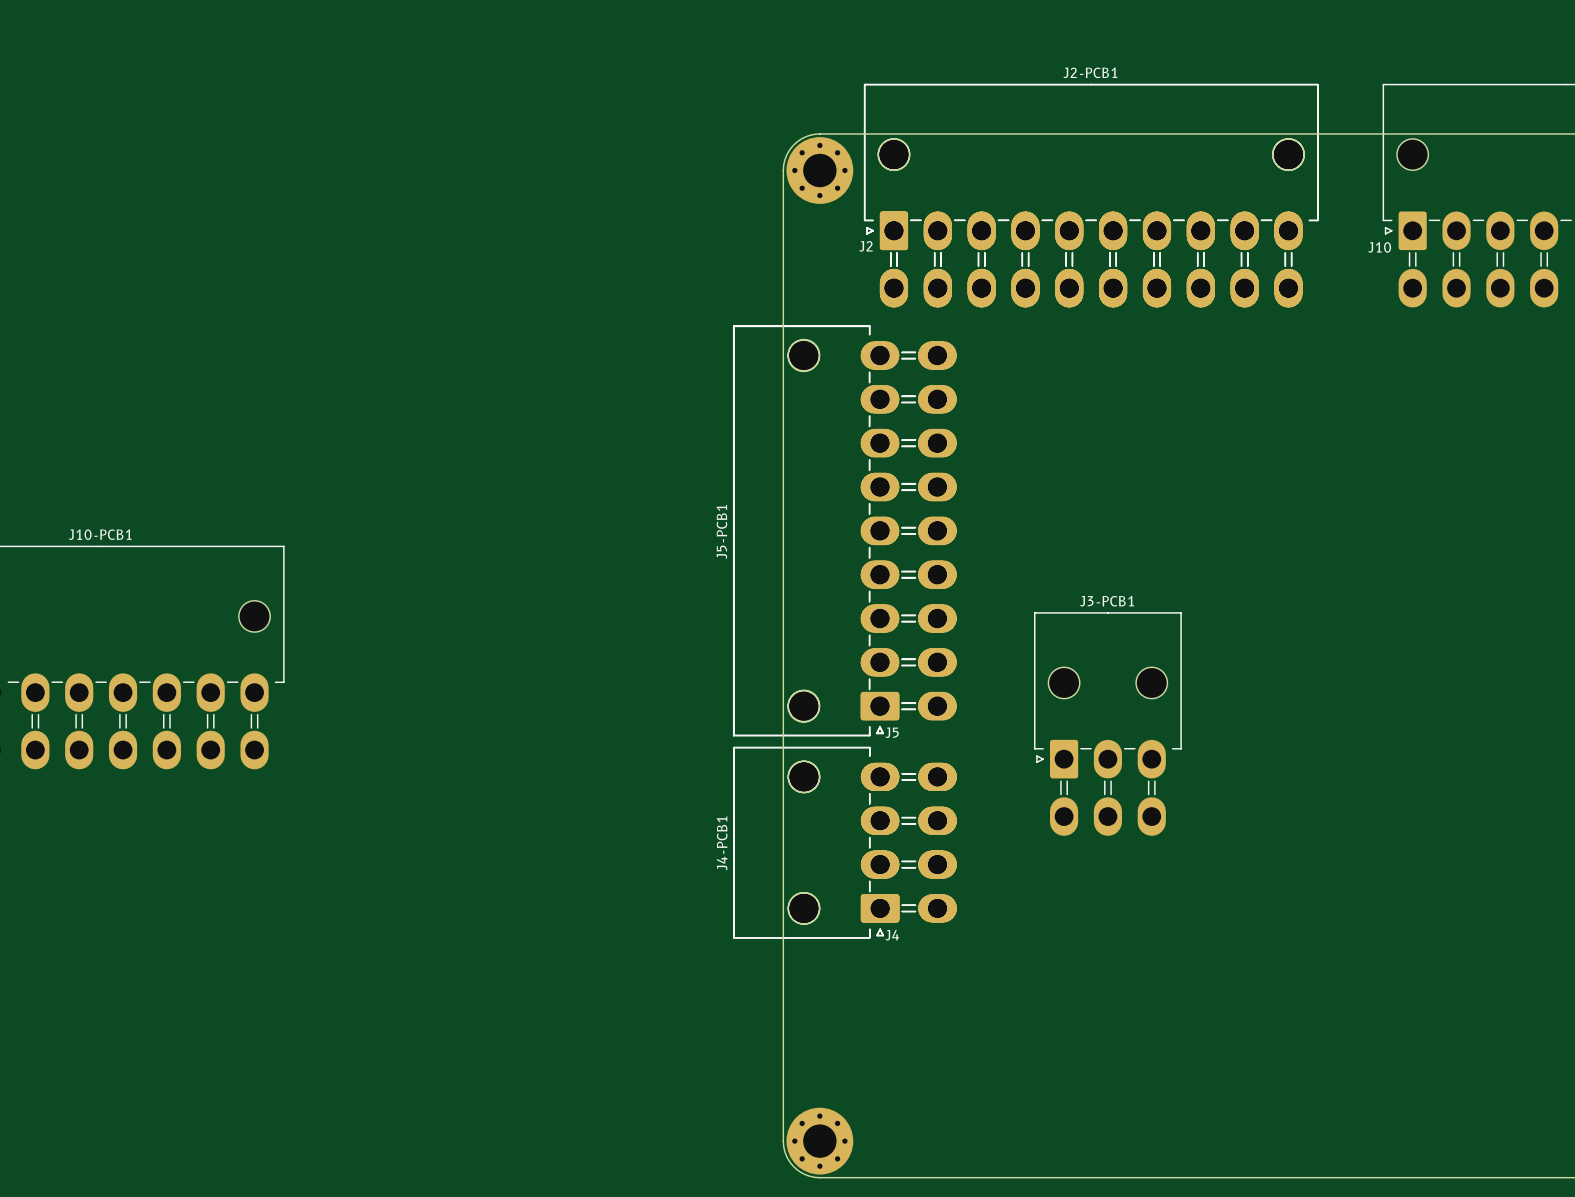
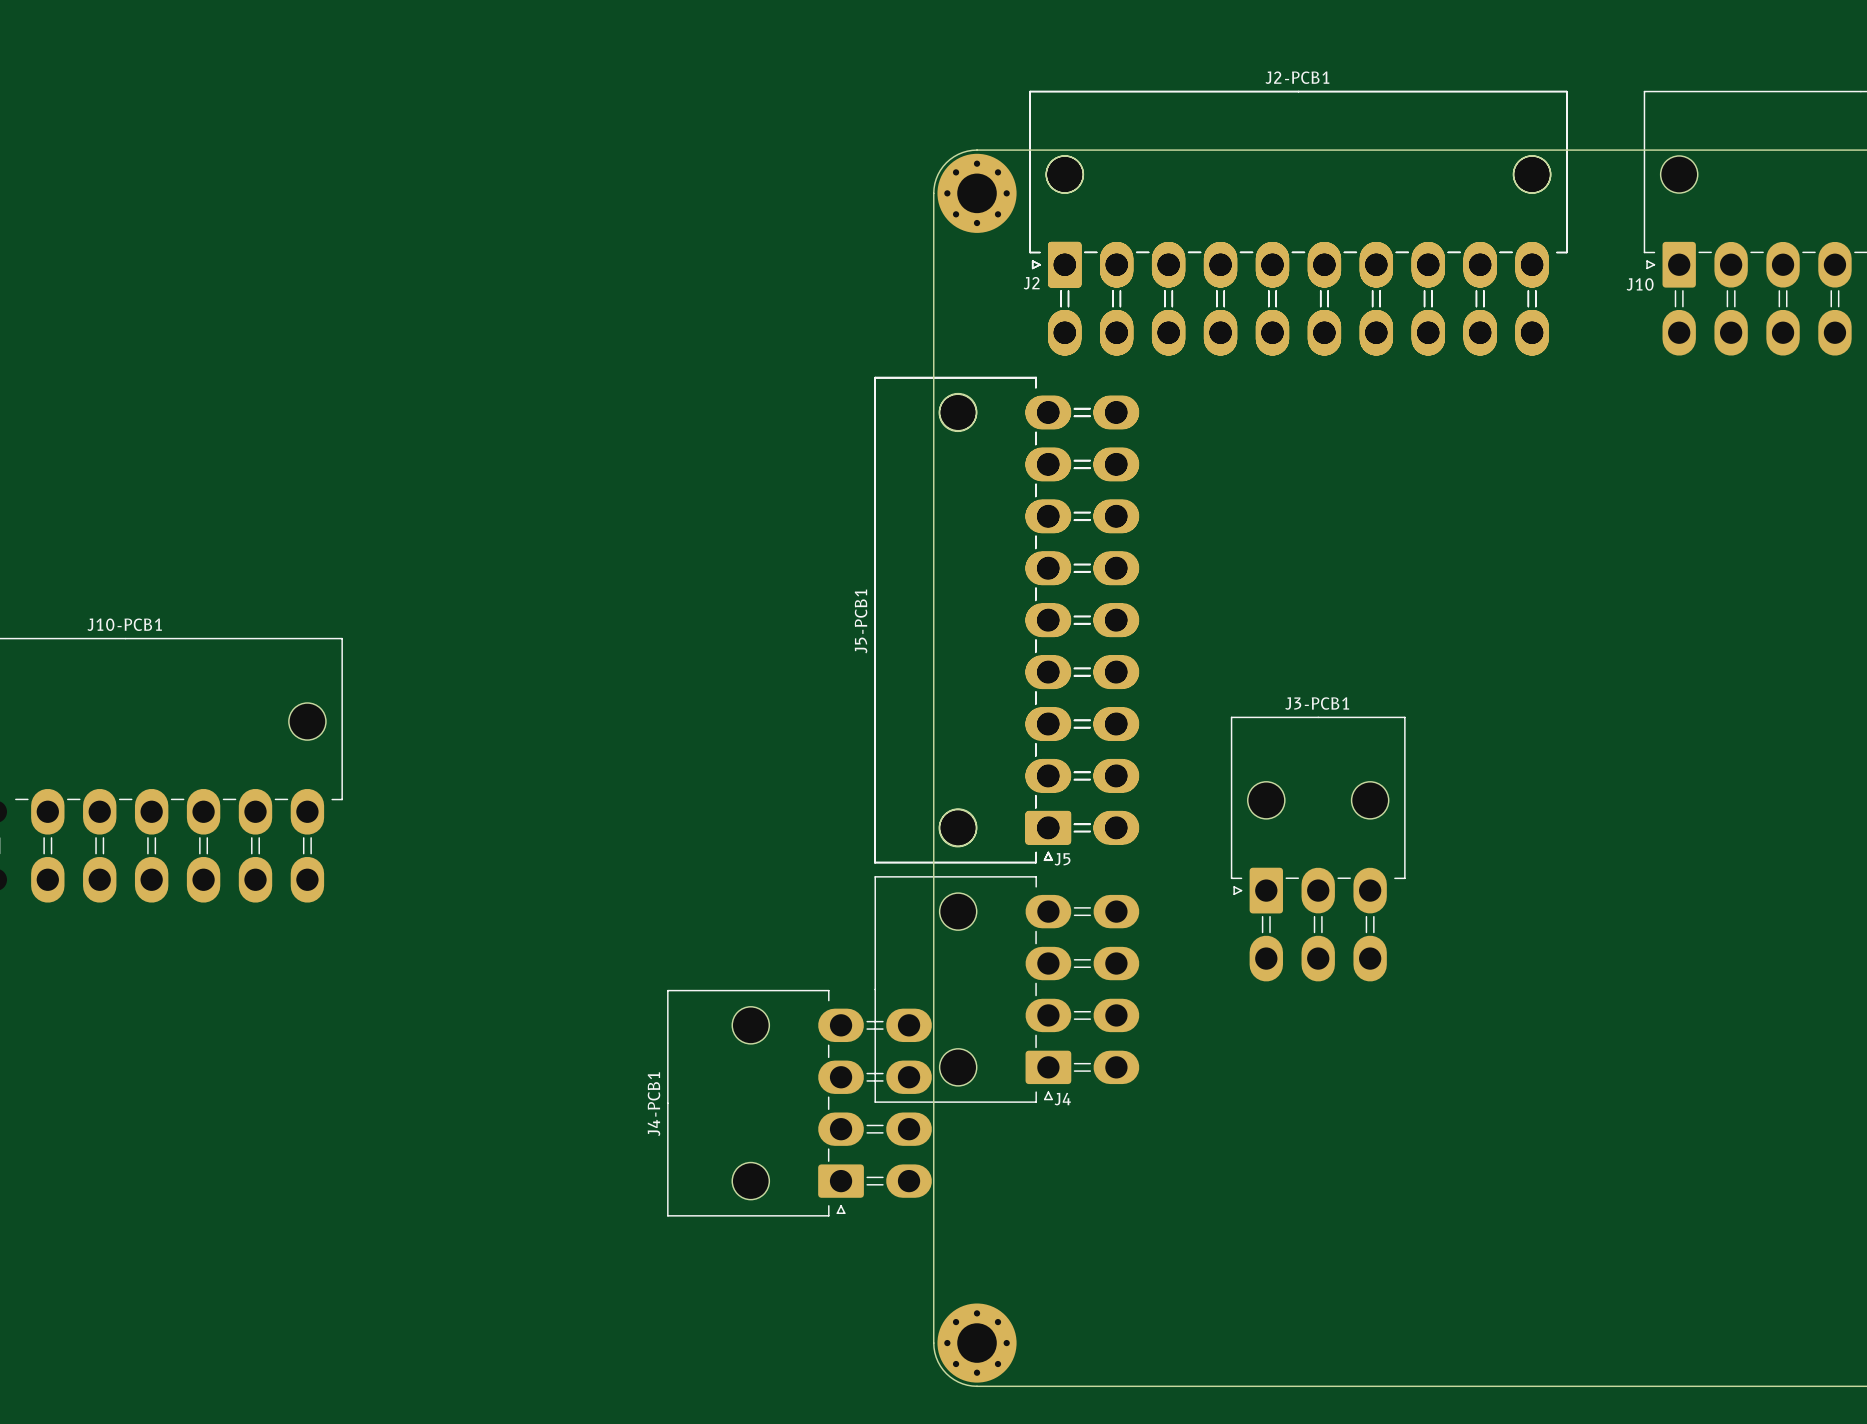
J4-PCB1 position: (845, 842) -> (799, 1103)

